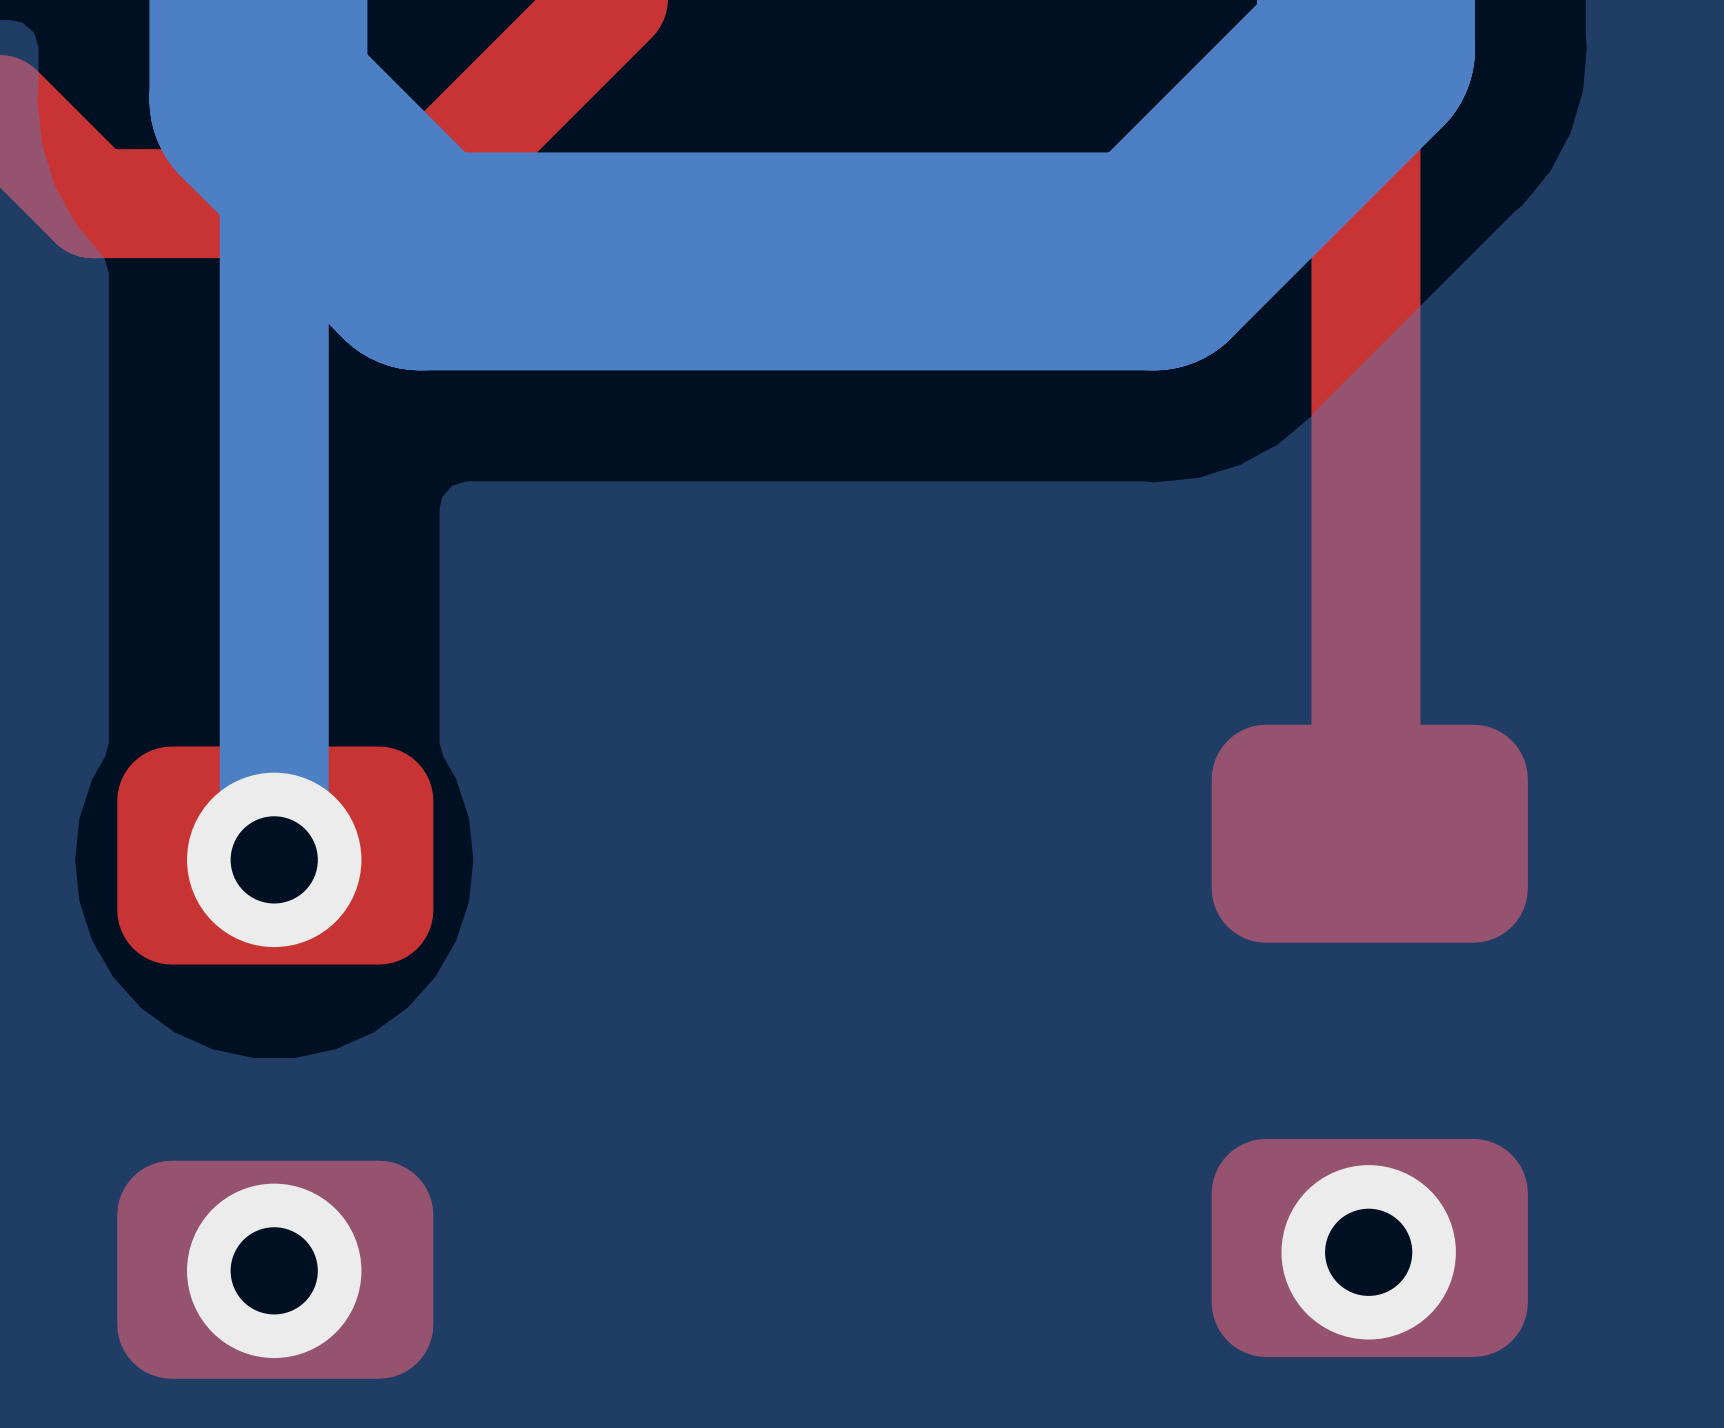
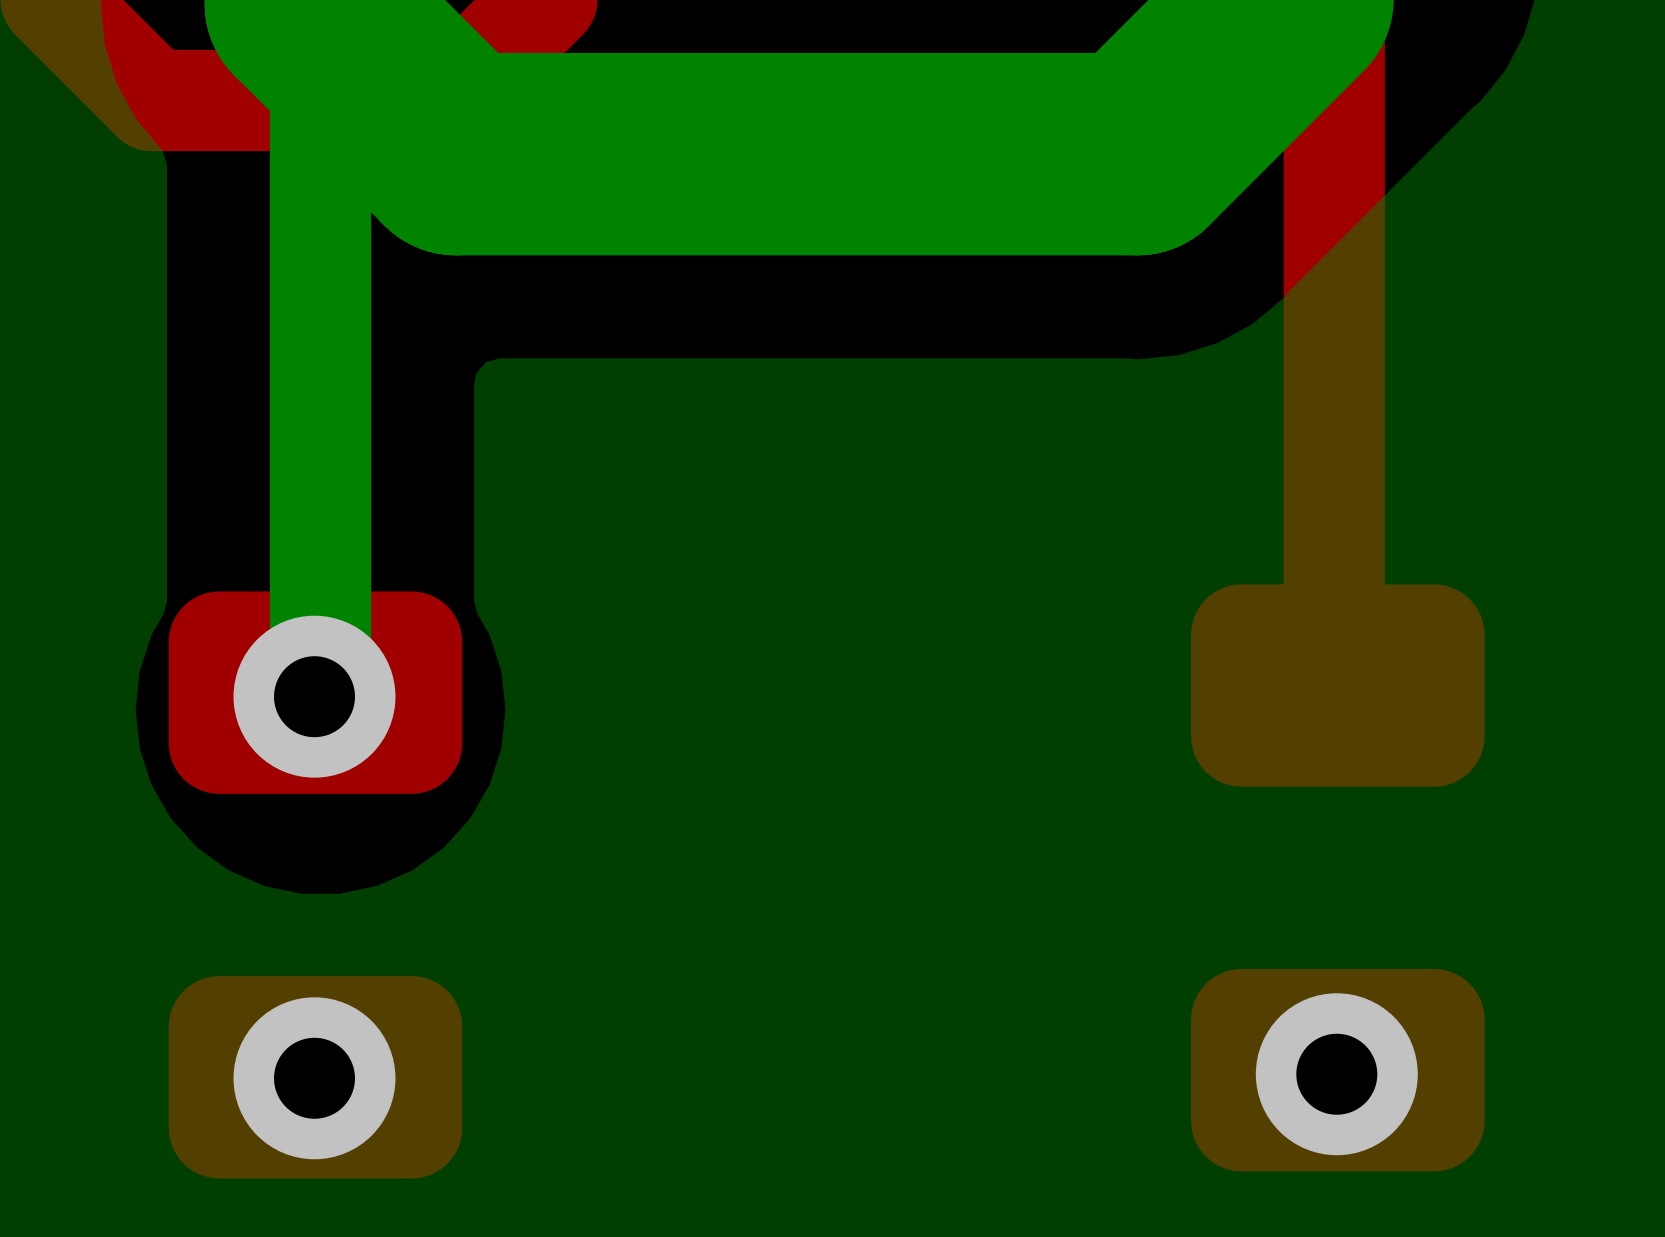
via position: (274, 859) -> (314, 696)
part position: (275, 1062) -> (315, 884)
via position: (274, 1270) -> (314, 1078)

